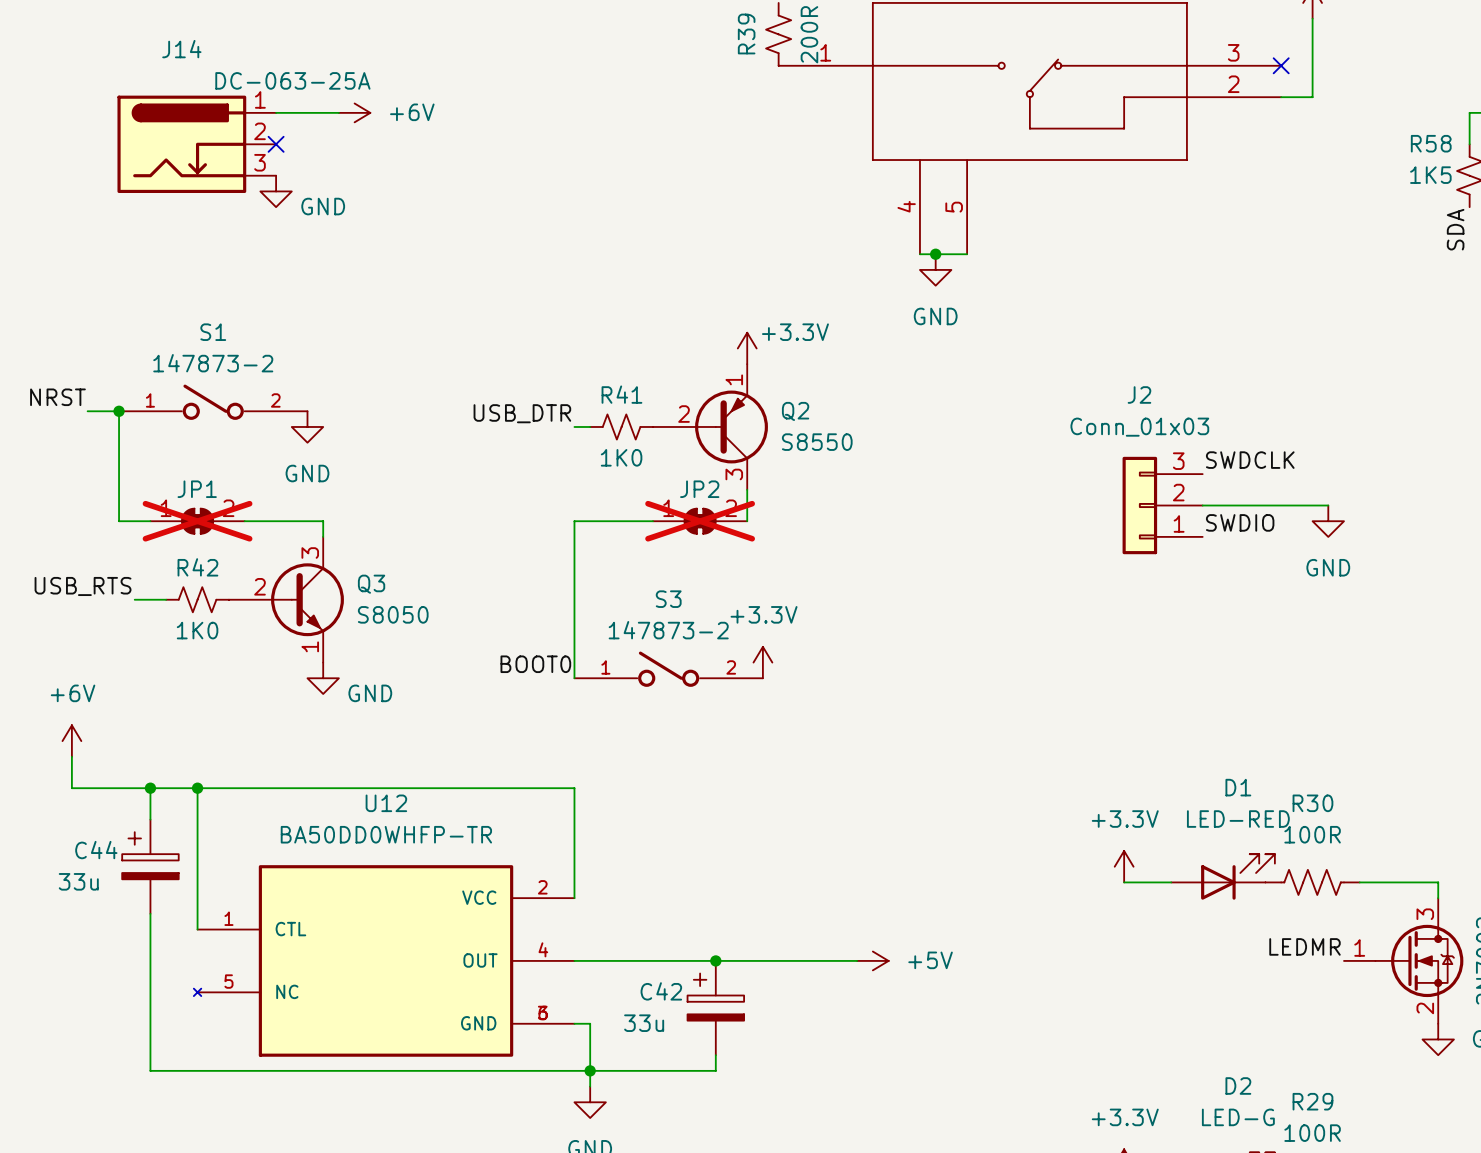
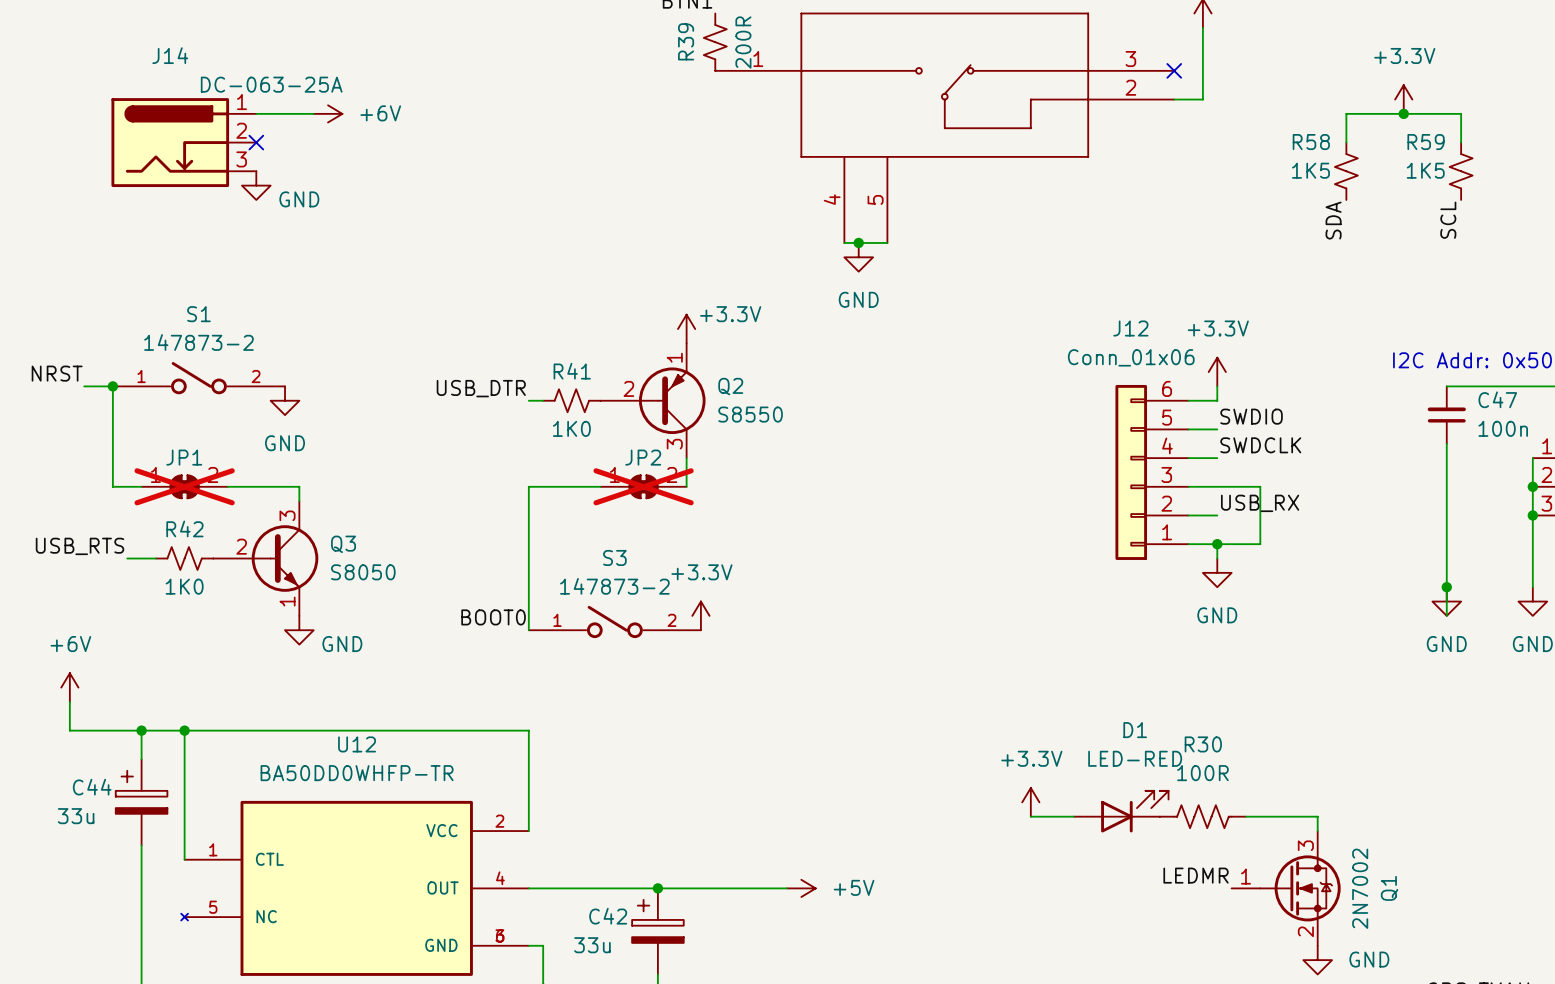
power symbol: none -> +3.3V (1217, 372)
wire: none -> (1217, 386) (1217, 400) (1188, 400)
wire: none -> (1188, 429) (1217, 429)
label position: SWDCLK (1250, 460) -> SWDCLK (1260, 445)
wire: none -> (1188, 458) (1217, 458)
J2: Conn_01x03 (1162, 505) -> none
wire: (1202, 505) (1328, 505) -> none
J12: none -> Conn_01x06 (1152, 472)
wire: none -> (1188, 486) (1260, 486) (1260, 544) (1188, 544)
power symbol position: GND (1328, 521) -> GND (1217, 572)
label position: SWDIO (1240, 522) -> SWDIO (1251, 416)
label: none -> USB_RX (1260, 503)
wire: none -> (1188, 515) (1217, 515)
wire: none -> (1217, 544) (1217, 558)
junction: none -> (1217, 544)

